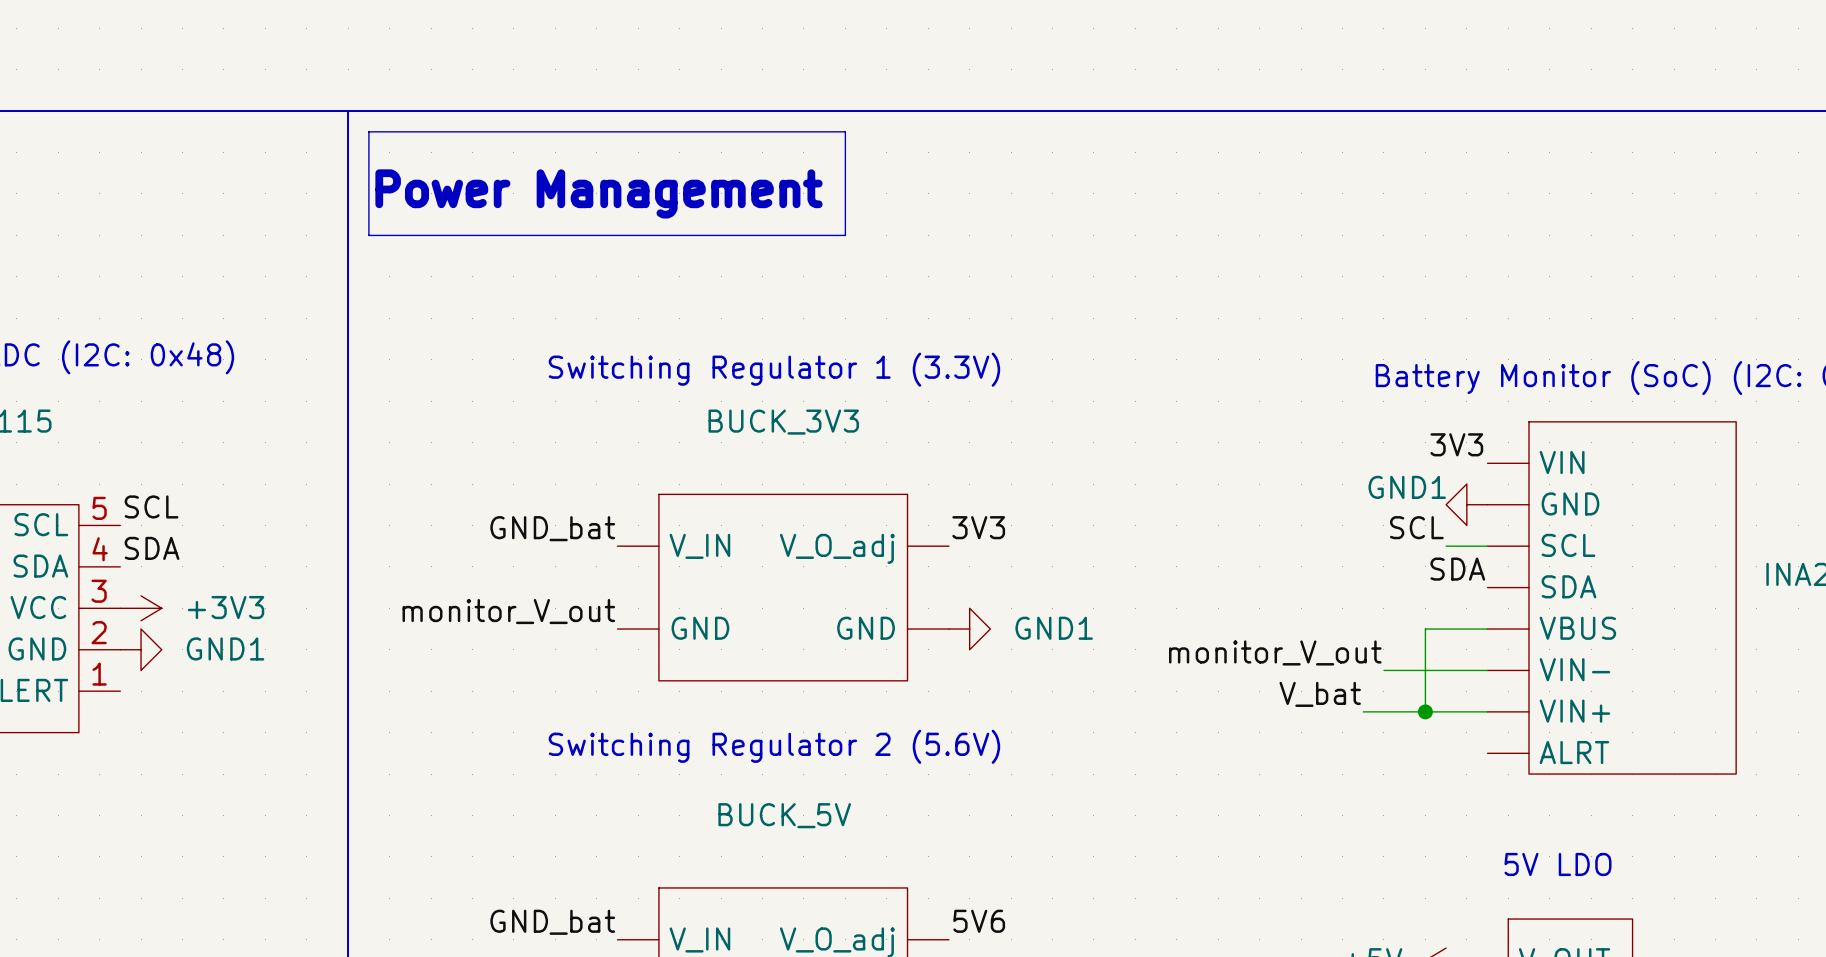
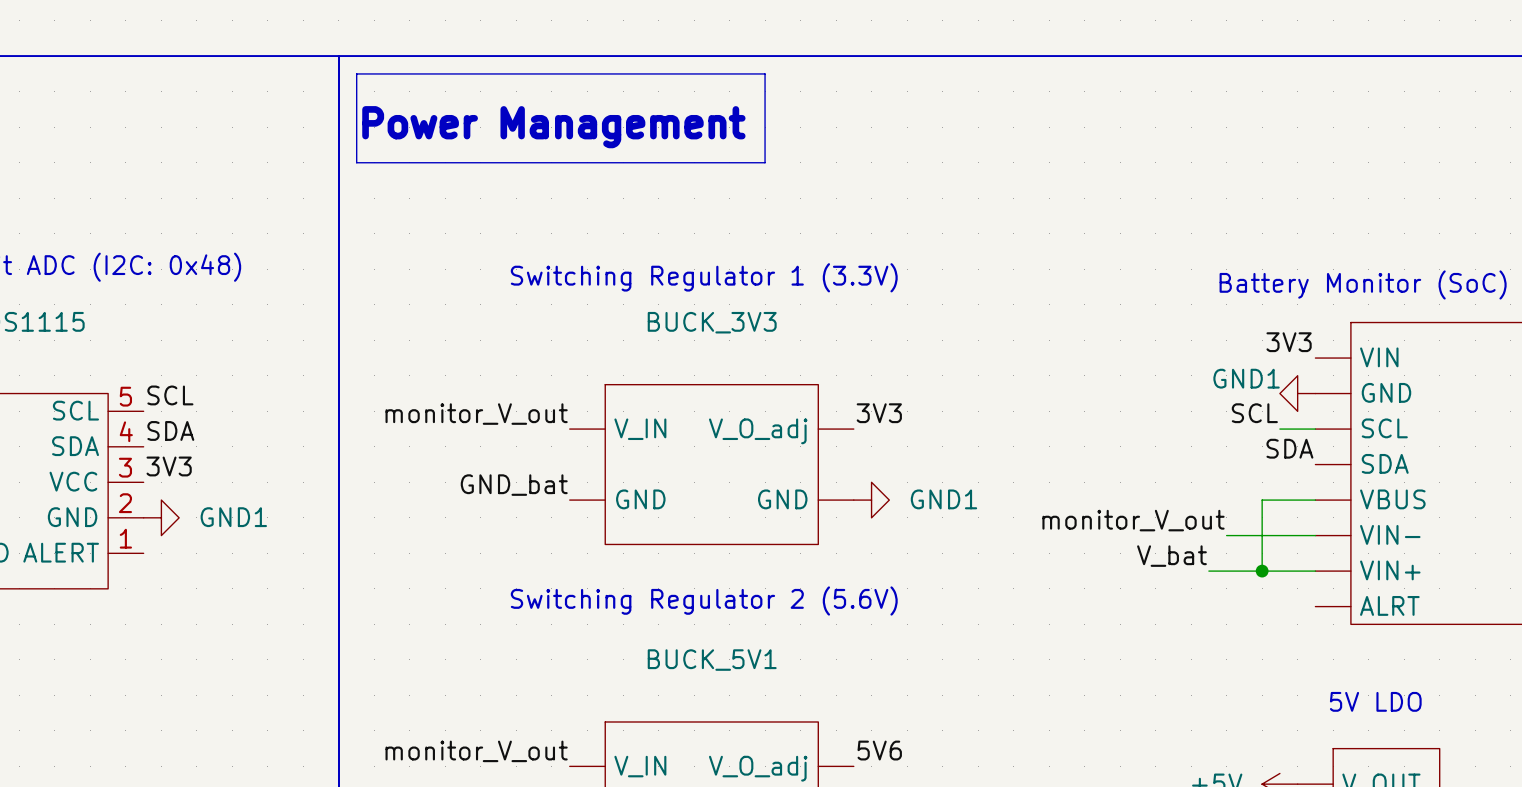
label: GND_bat (552, 528) -> monitor_V_out (476, 414)
label: none -> 3V3 (169, 466)
power symbol: +3V3 (141, 608) -> none
label: monitor_V_out (508, 611) -> GND_bat (514, 485)
BUCK_5V name: BUCK_5V (784, 815) -> BUCK_5V1 (712, 660)
label: GND_bat (552, 922) -> monitor_V_out (476, 751)

